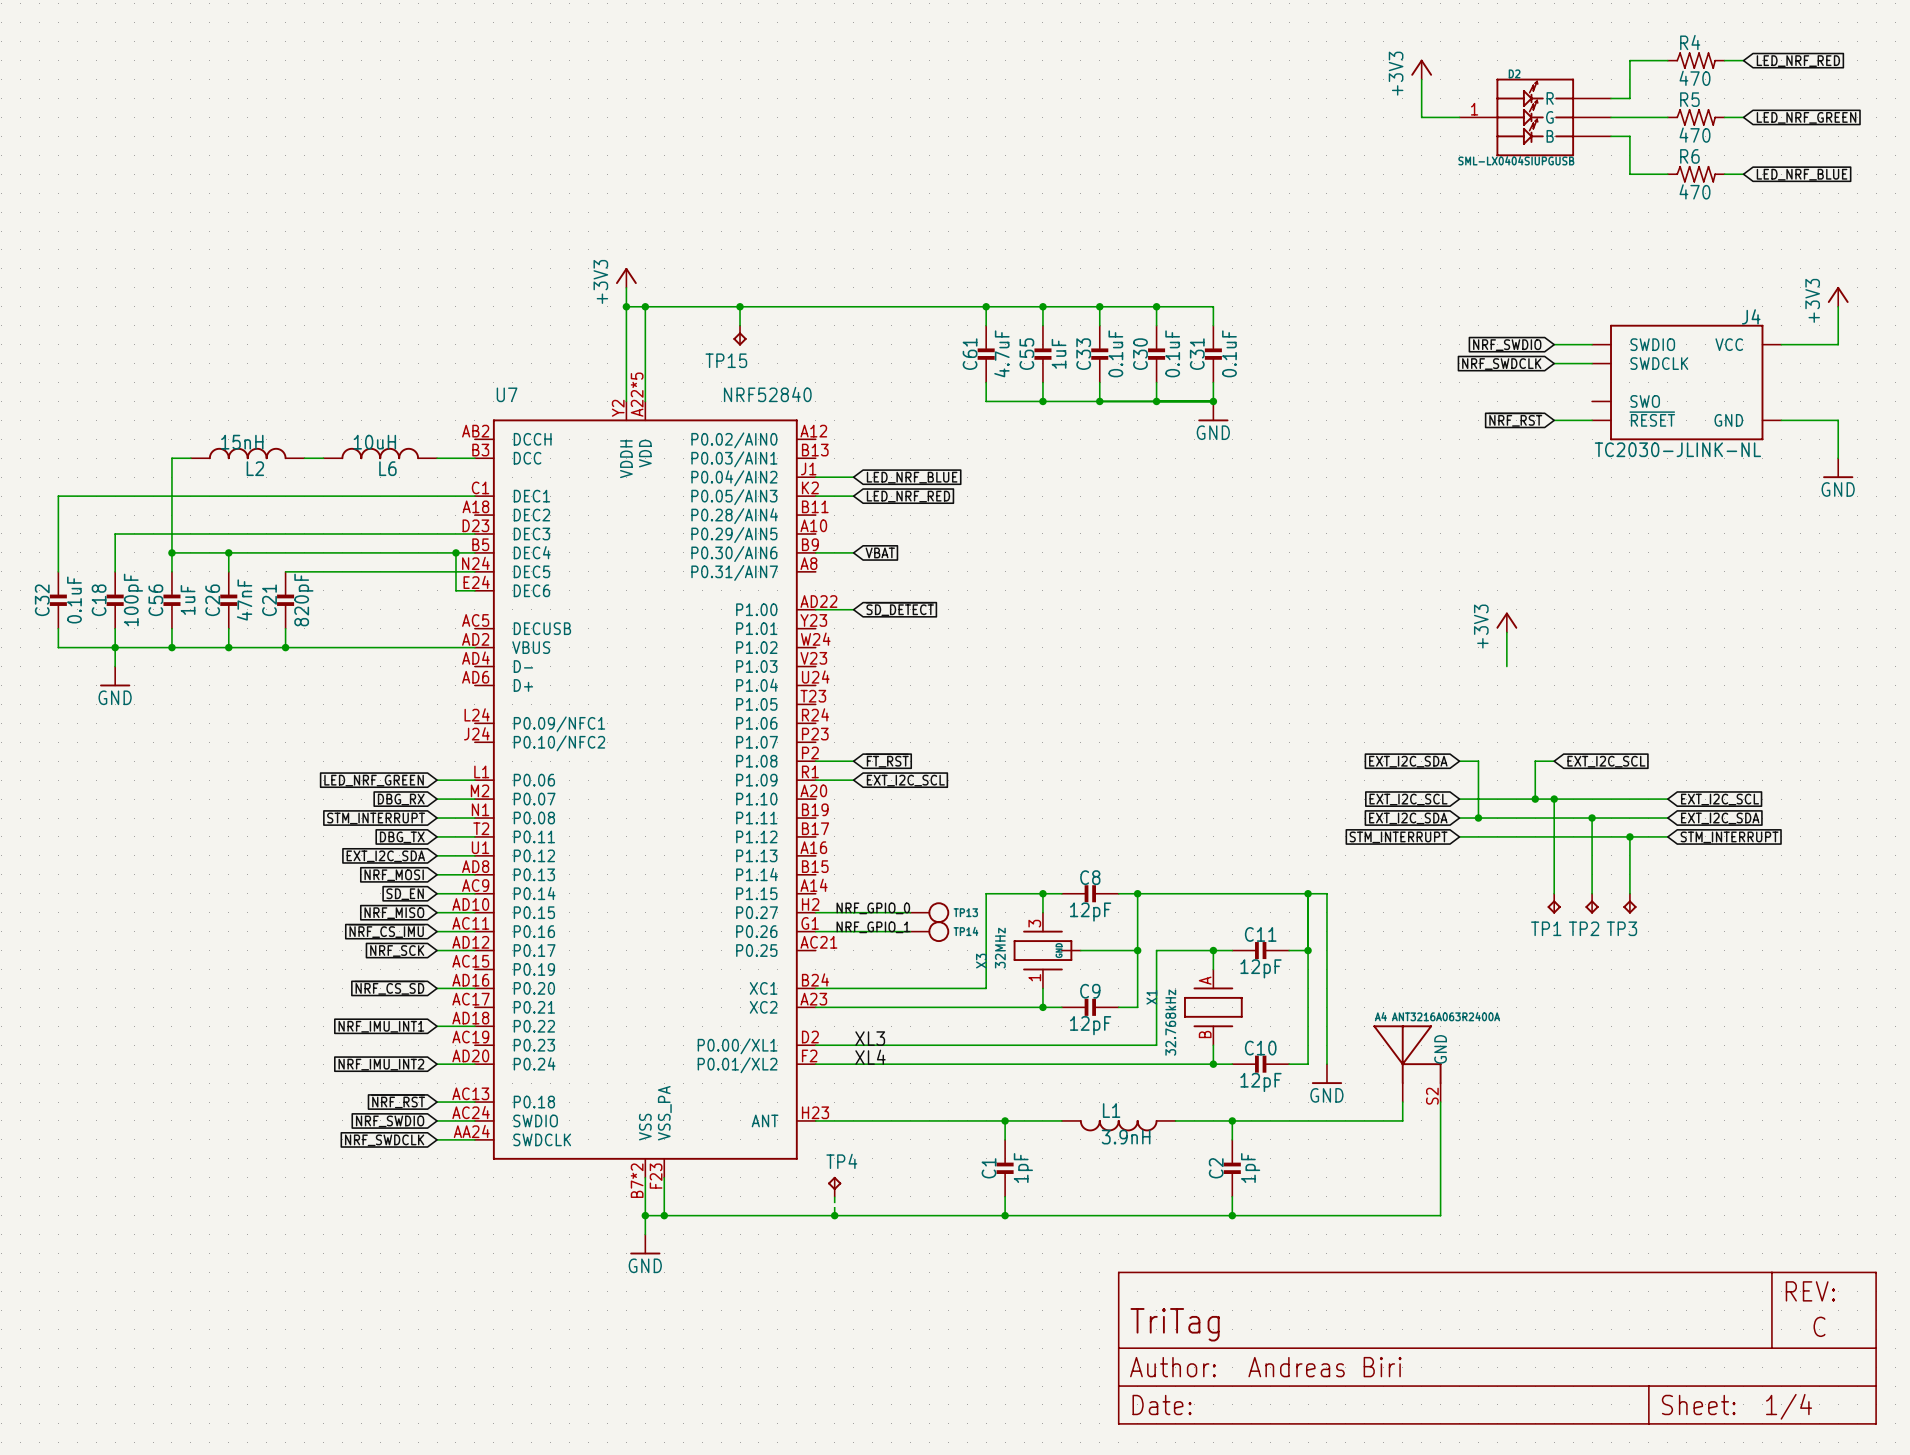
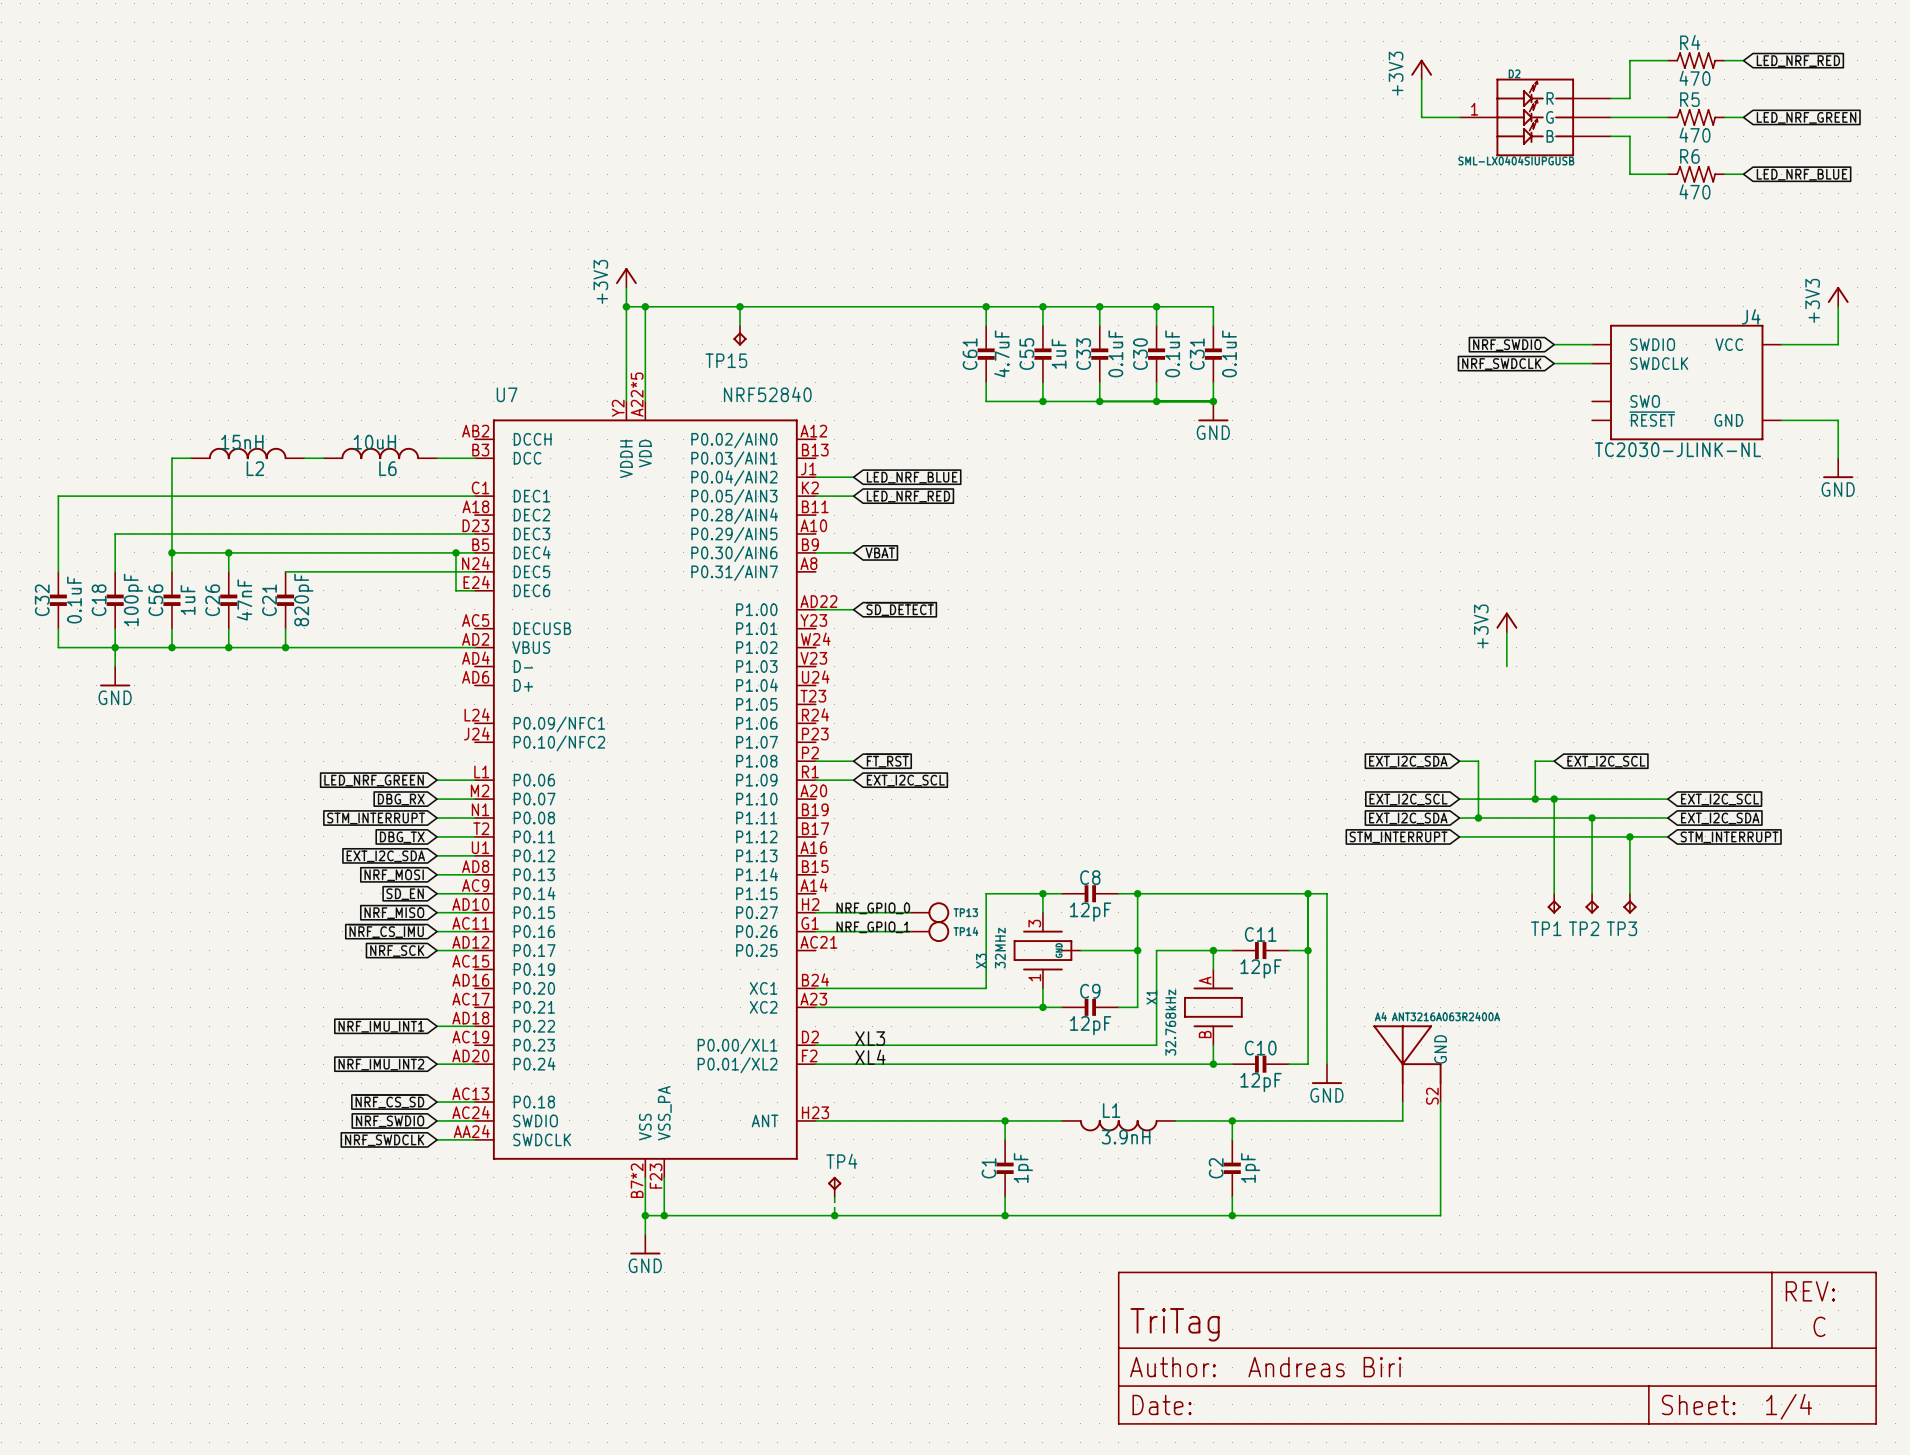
global label: ~{NRF_RST} (1515, 419) -> none
wire: (1554, 420) (1592, 420) -> none
global label: ~{NRF_CS_SD} (389, 987) -> none
wire: (437, 988) (474, 988) -> none
global label: ~{NRF_RST} (398, 1101) -> ~{NRF_CS_SD} (389, 1101)

